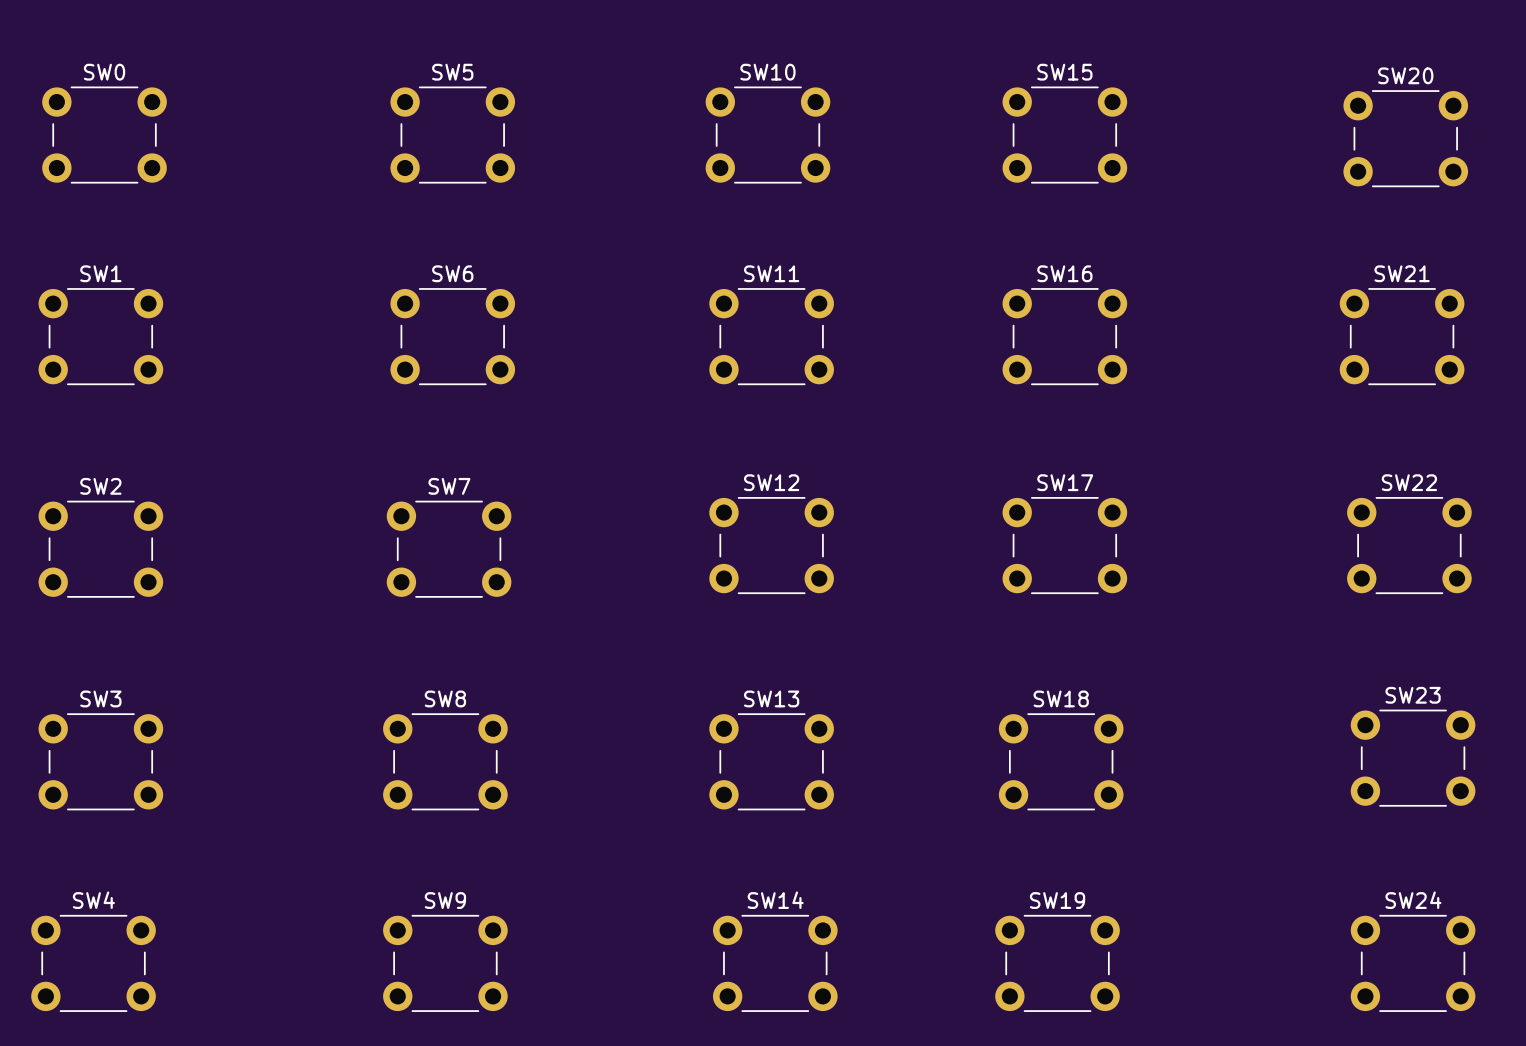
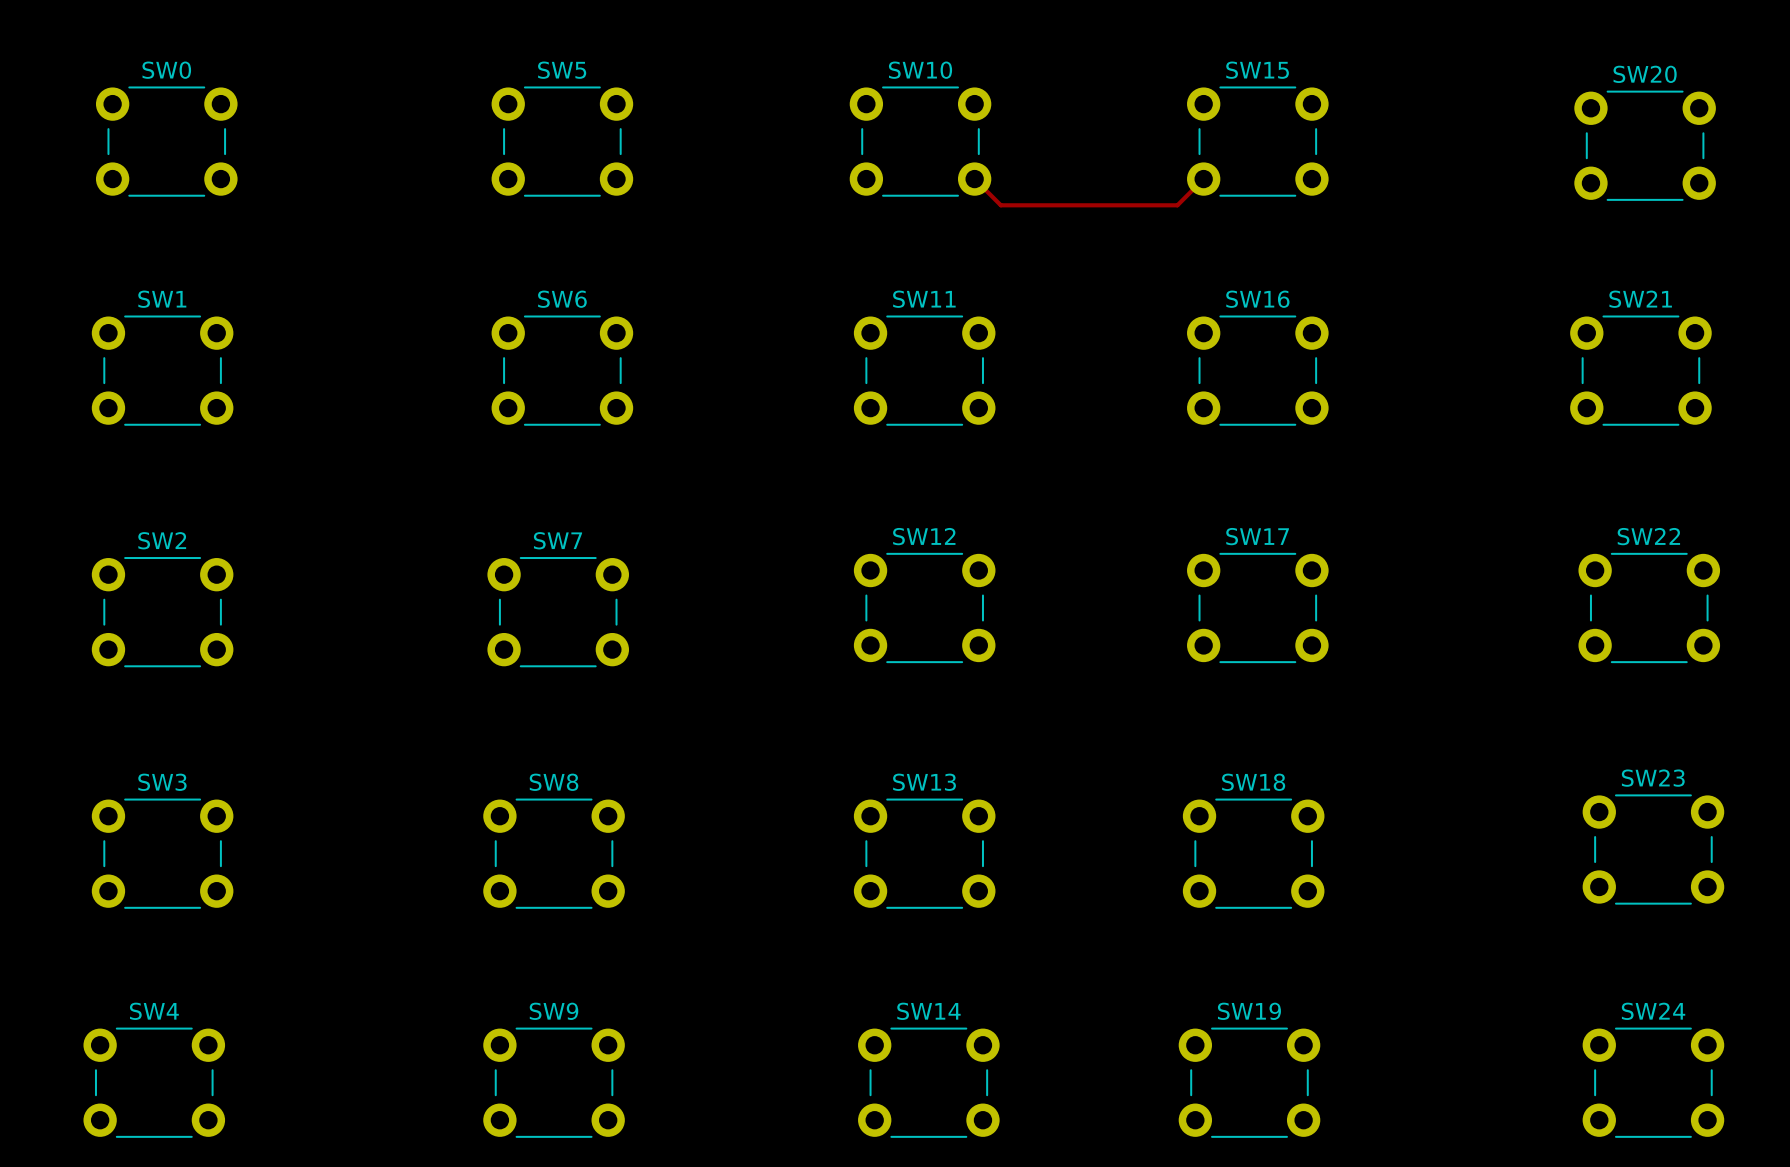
track: none -> (974, 179) (1000, 205) (1177, 205) (1203, 179)

